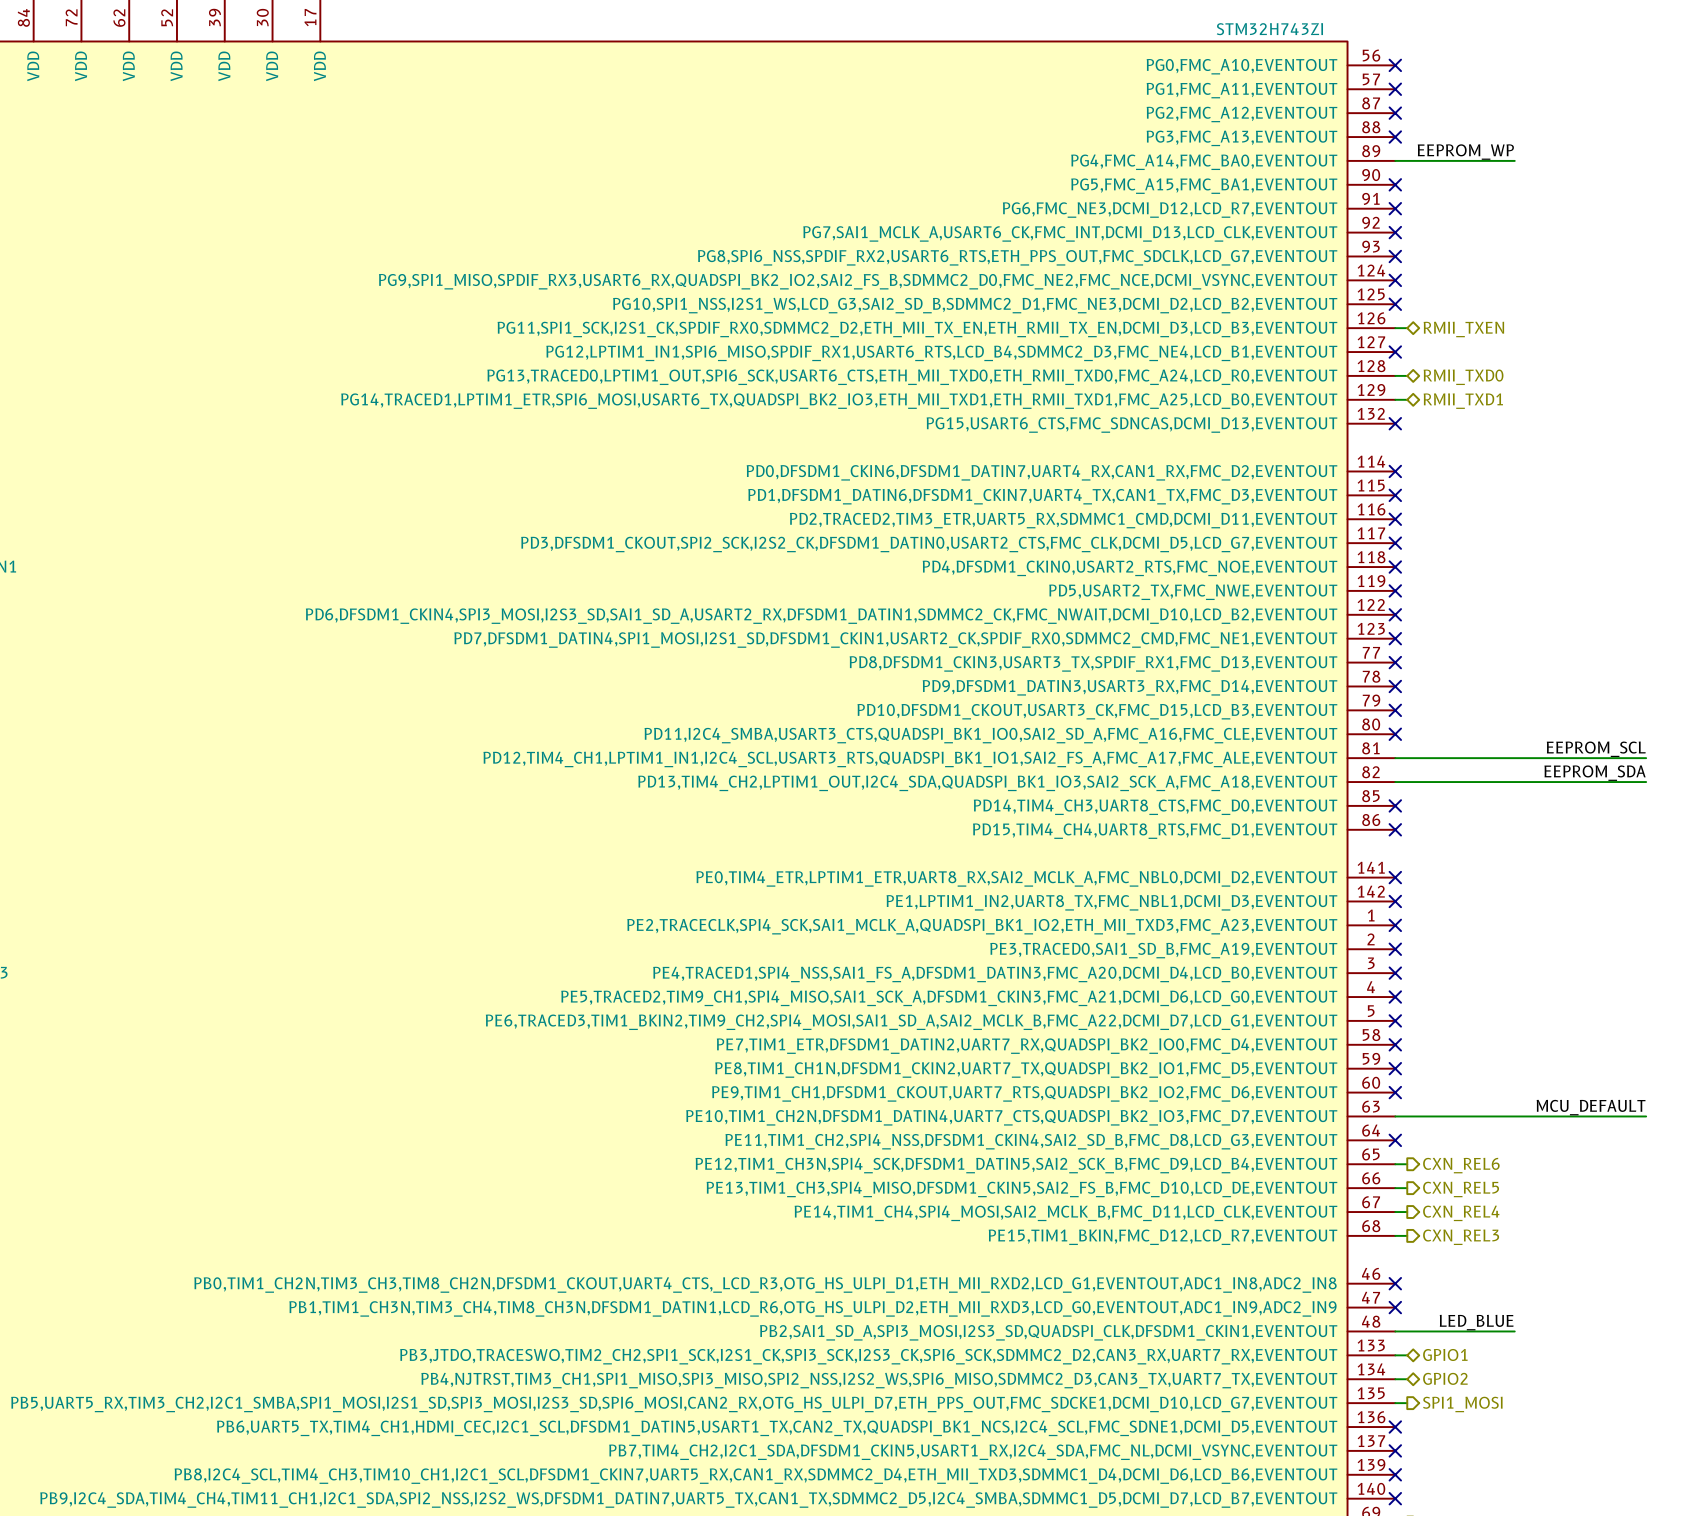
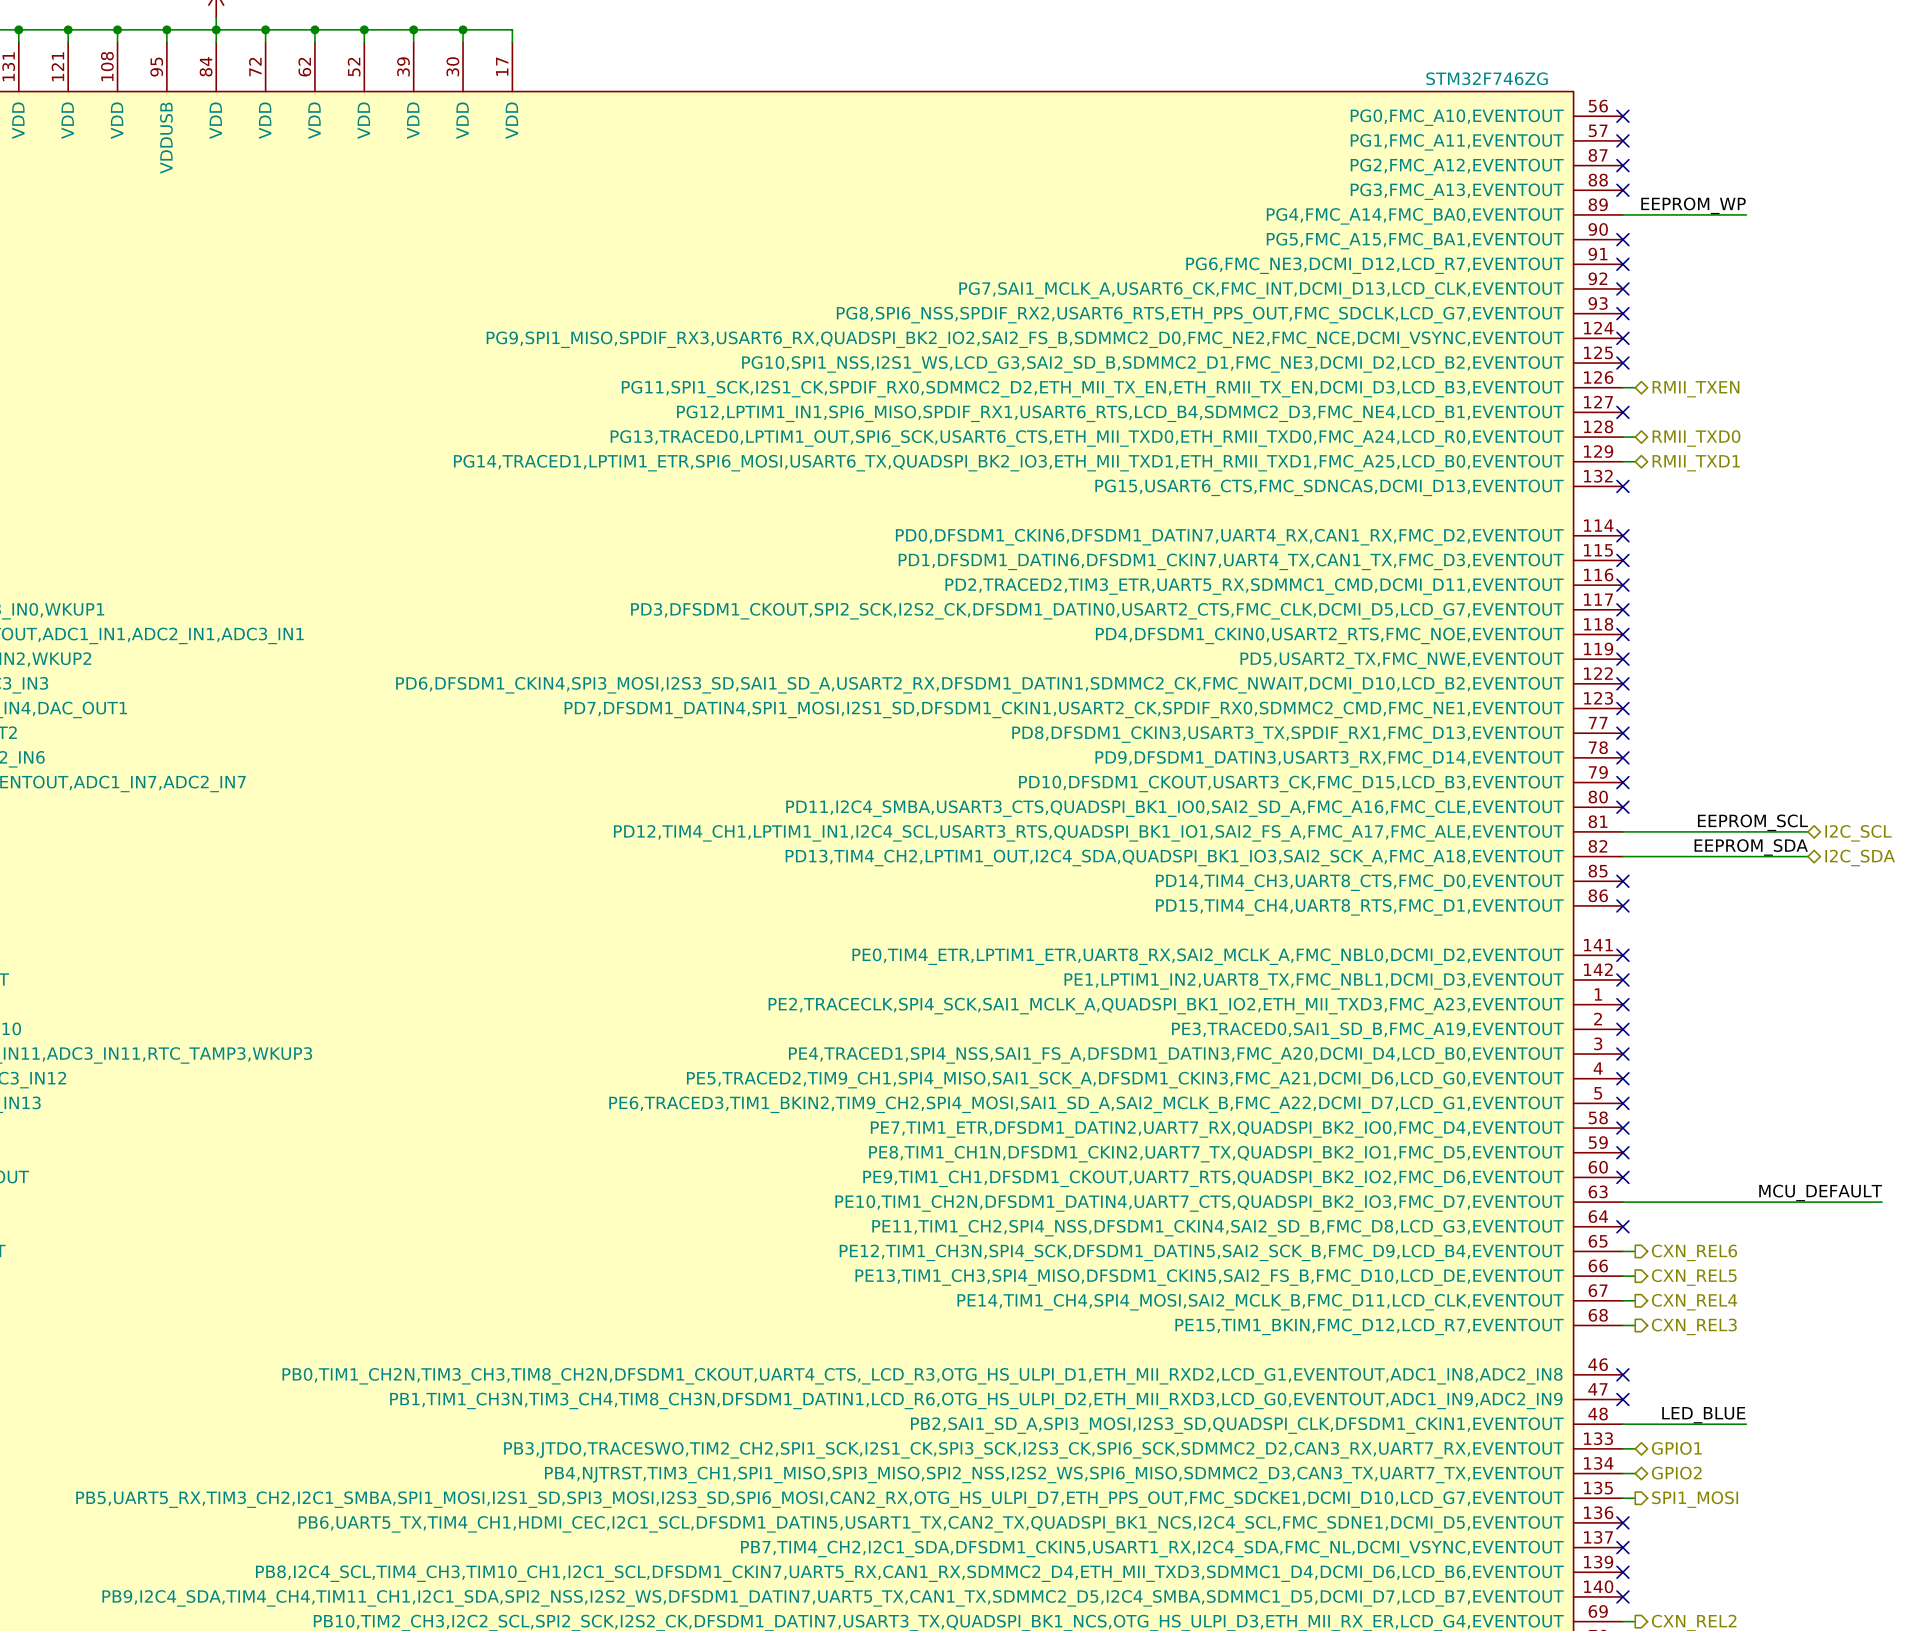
part value: STM32H743ZI (1269, 29) -> STM32F746ZG (1487, 78)
label position: EEPROM_SCL (1596, 749) -> EEPROM_SCL (1752, 822)
wire: (1574, 758) (1646, 758) -> none
hierarchical label: none -> I2C_SCL (1858, 833)
label position: EEPROM_SDA (1595, 773) -> EEPROM_SDA (1751, 847)
wire: (1574, 782) (1646, 782) -> none
hierarchical label: none -> I2C_SDA (1860, 858)

